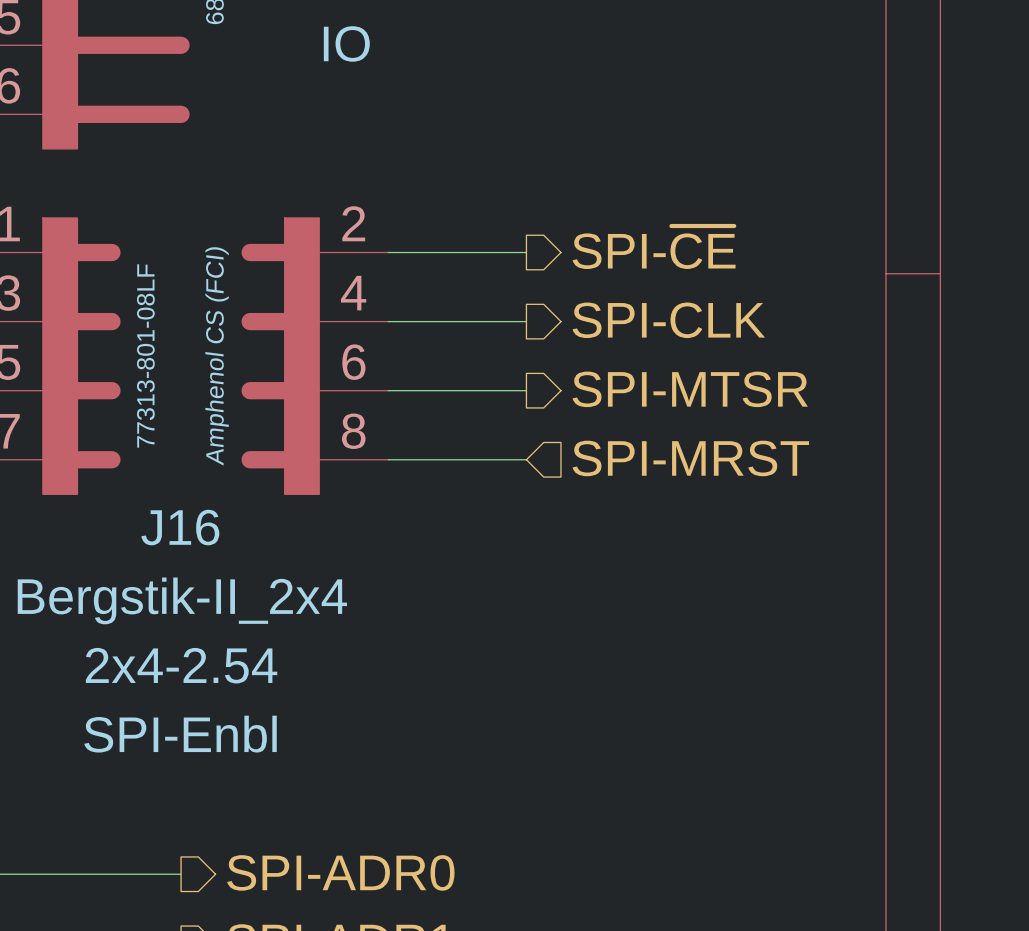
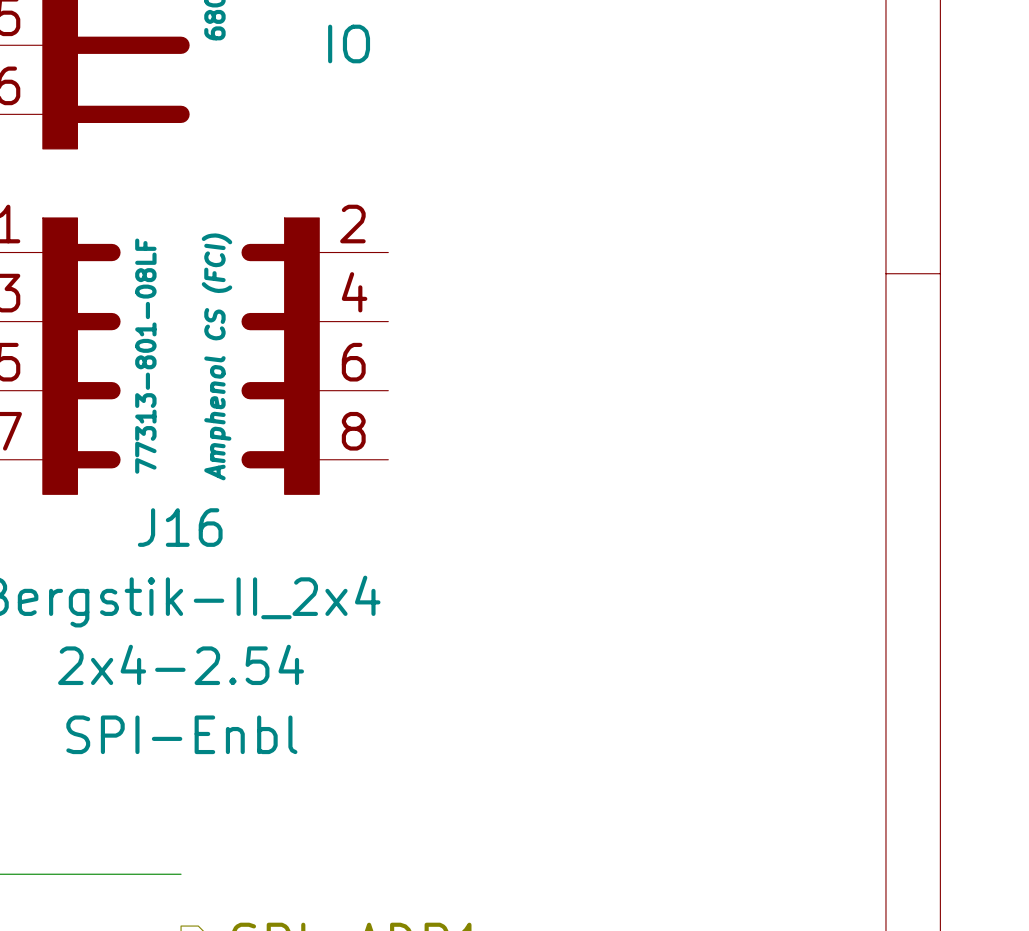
hierarchical label: SPI-~{CE} (654, 247) -> none
wire: (388, 252) (526, 252) -> none
hierarchical label: SPI-CLK (668, 320) -> none
wire: (388, 321) (526, 321) -> none
hierarchical label: SPI-MTSR (690, 389) -> none
wire: (388, 390) (526, 390) -> none
hierarchical label: SPI-MRST (690, 458) -> none
wire: (388, 459) (526, 459) -> none
hierarchical label: SPI-ADR0 (340, 872) -> none

